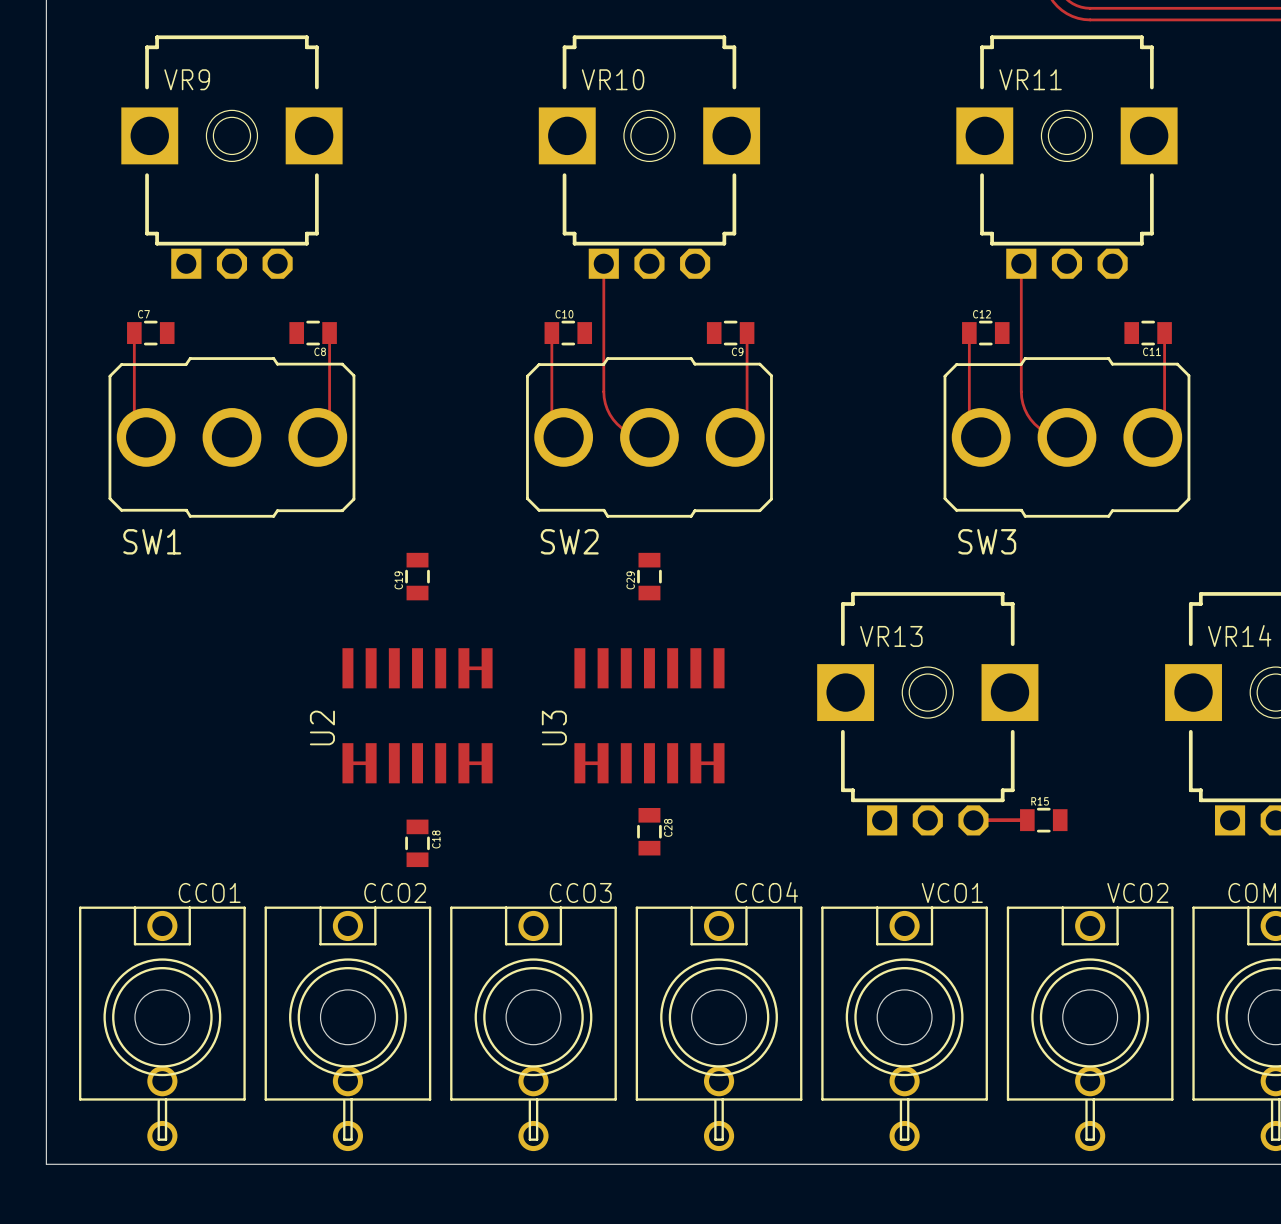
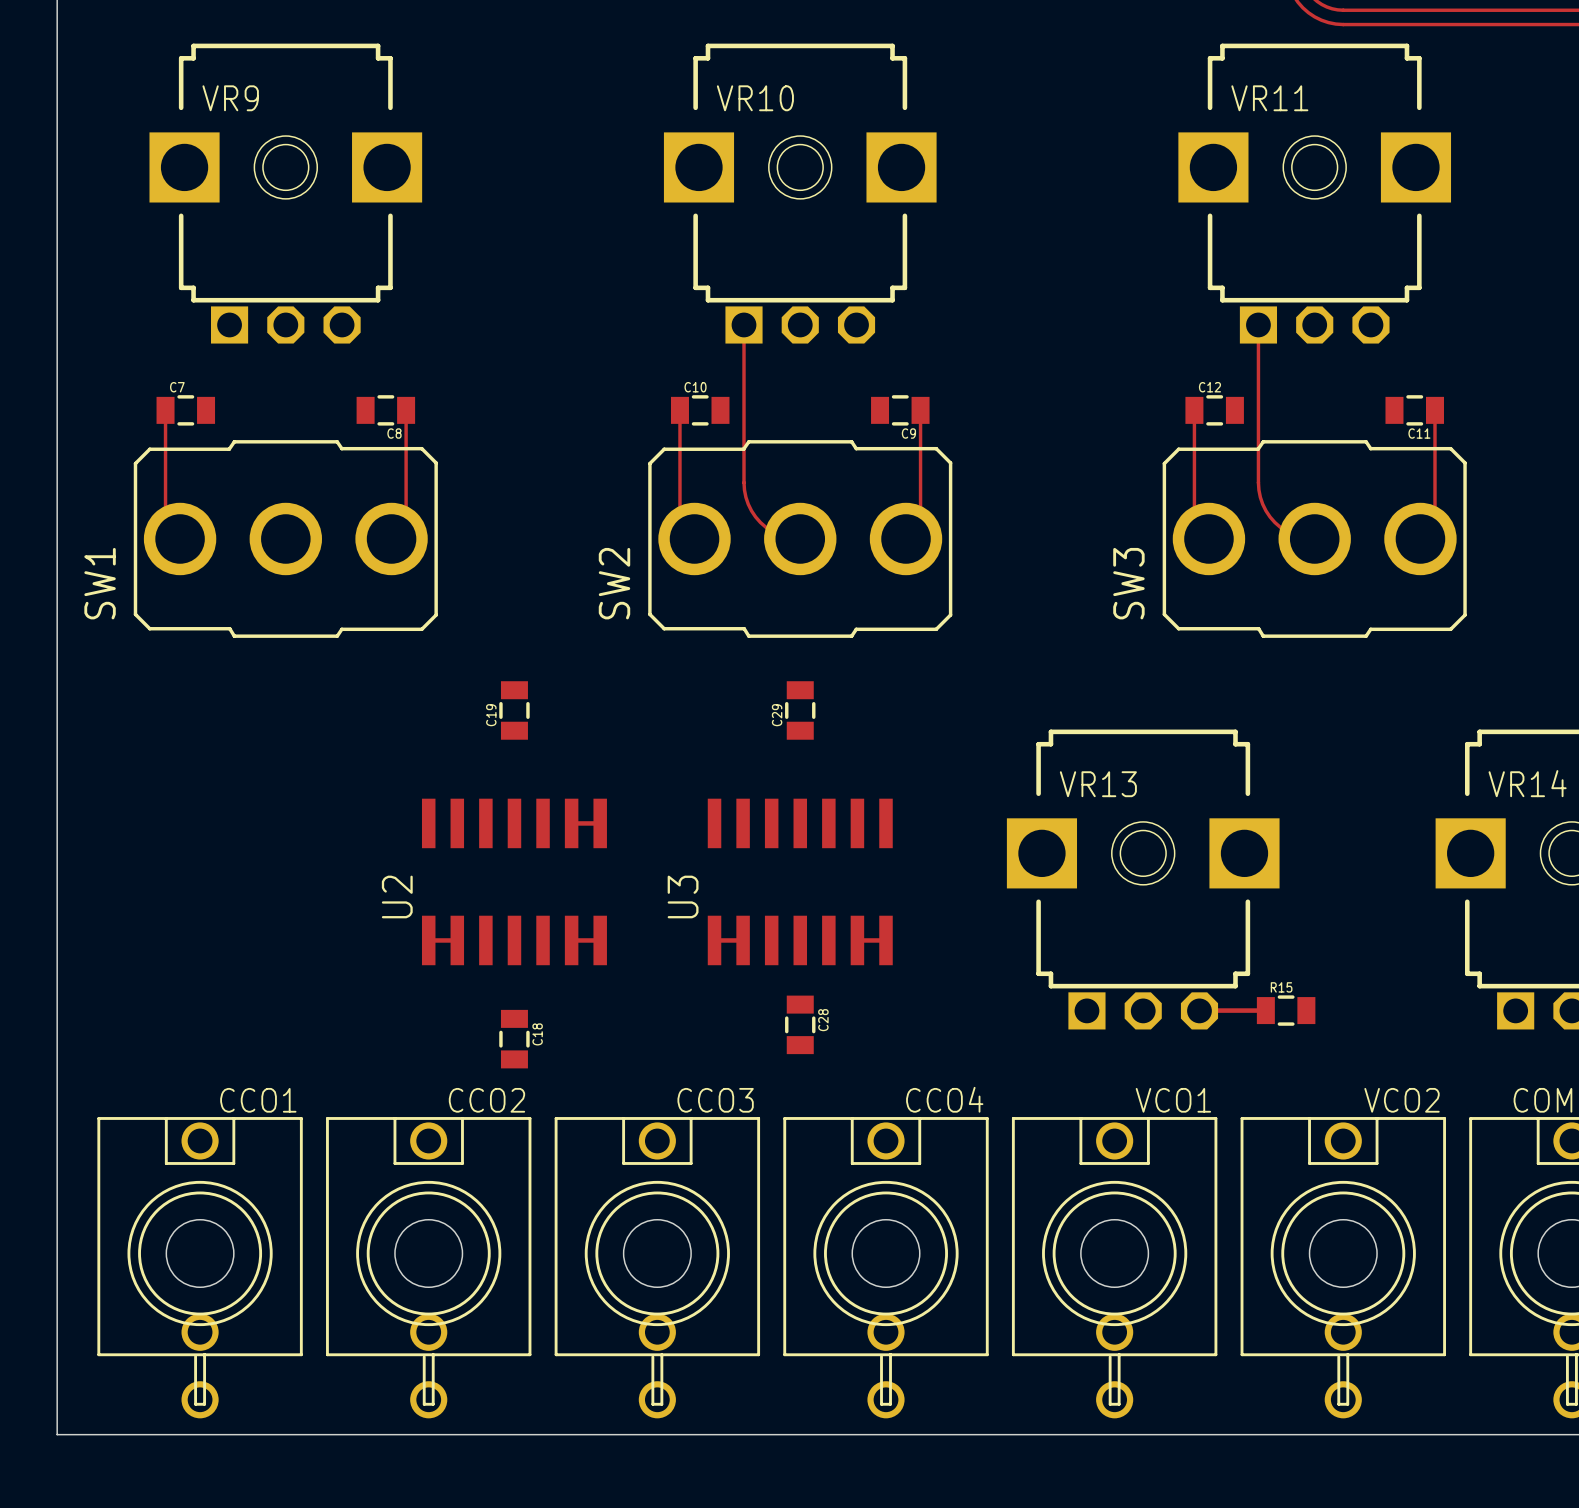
SW1 name rotation: 0° (152, 541) -> 90° counterclockwise (100, 583)
SW1 name position: SW1 (152, 541) -> SW1 (100, 583)
SW2 name rotation: 0° (569, 541) -> 90° counterclockwise (614, 583)
SW2 name position: SW2 (569, 541) -> SW2 (614, 583)
SW3 name rotation: 0° (987, 541) -> 90° counterclockwise (1128, 583)
SW3 name position: SW3 (987, 541) -> SW3 (1128, 583)

